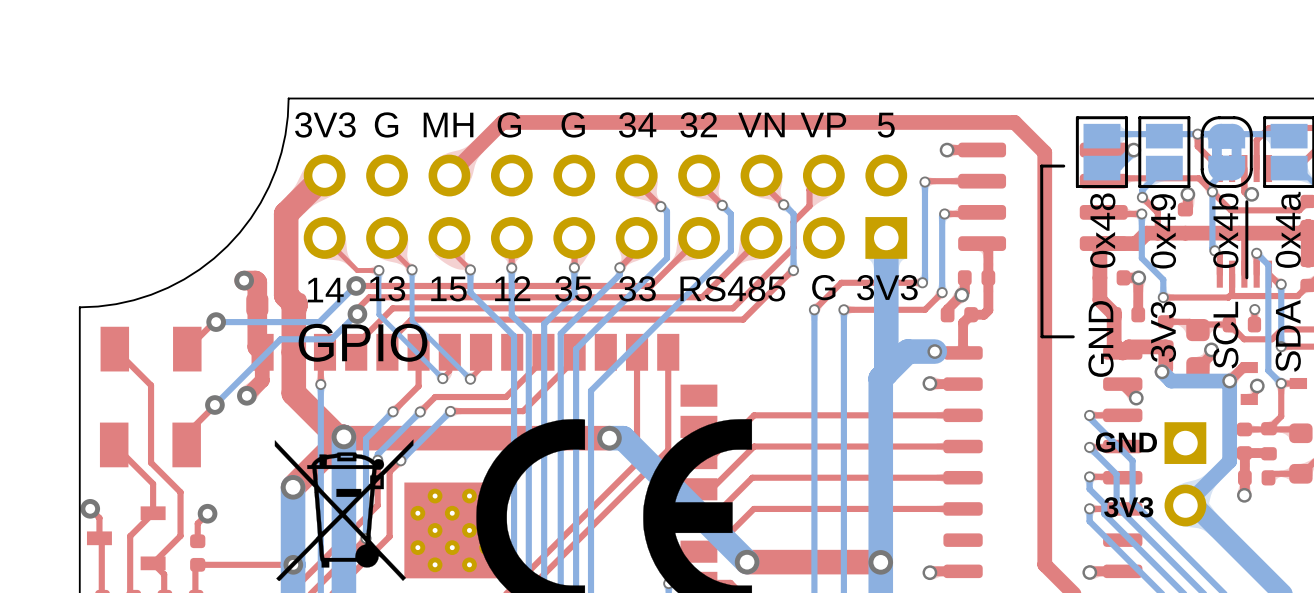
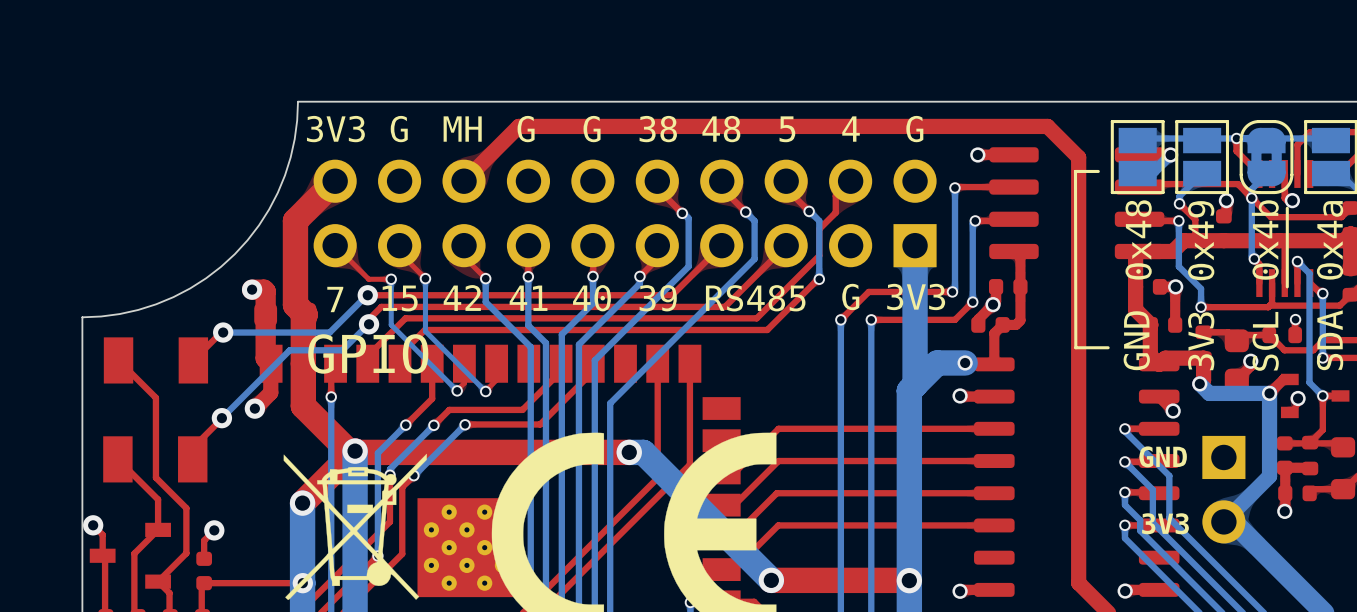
text: 34 (637, 124) -> 38 (658, 129)
text: 32 (698, 124) -> 48 (721, 129)
text: VN (761, 124) -> 5 (787, 129)
text: VP (823, 124) -> 4 (851, 129)
text: 5 (886, 125) -> G (914, 129)
text: 13 (387, 288) -> 15 (400, 298)
text: 12 (512, 288) -> 41 (528, 298)
text: 35 (573, 288) -> 40 (592, 298)
text: 33 (637, 288) -> 39 (658, 298)
text: 15 (448, 289) -> 42 (462, 298)
text: 14 (325, 290) -> 7 (335, 299)

